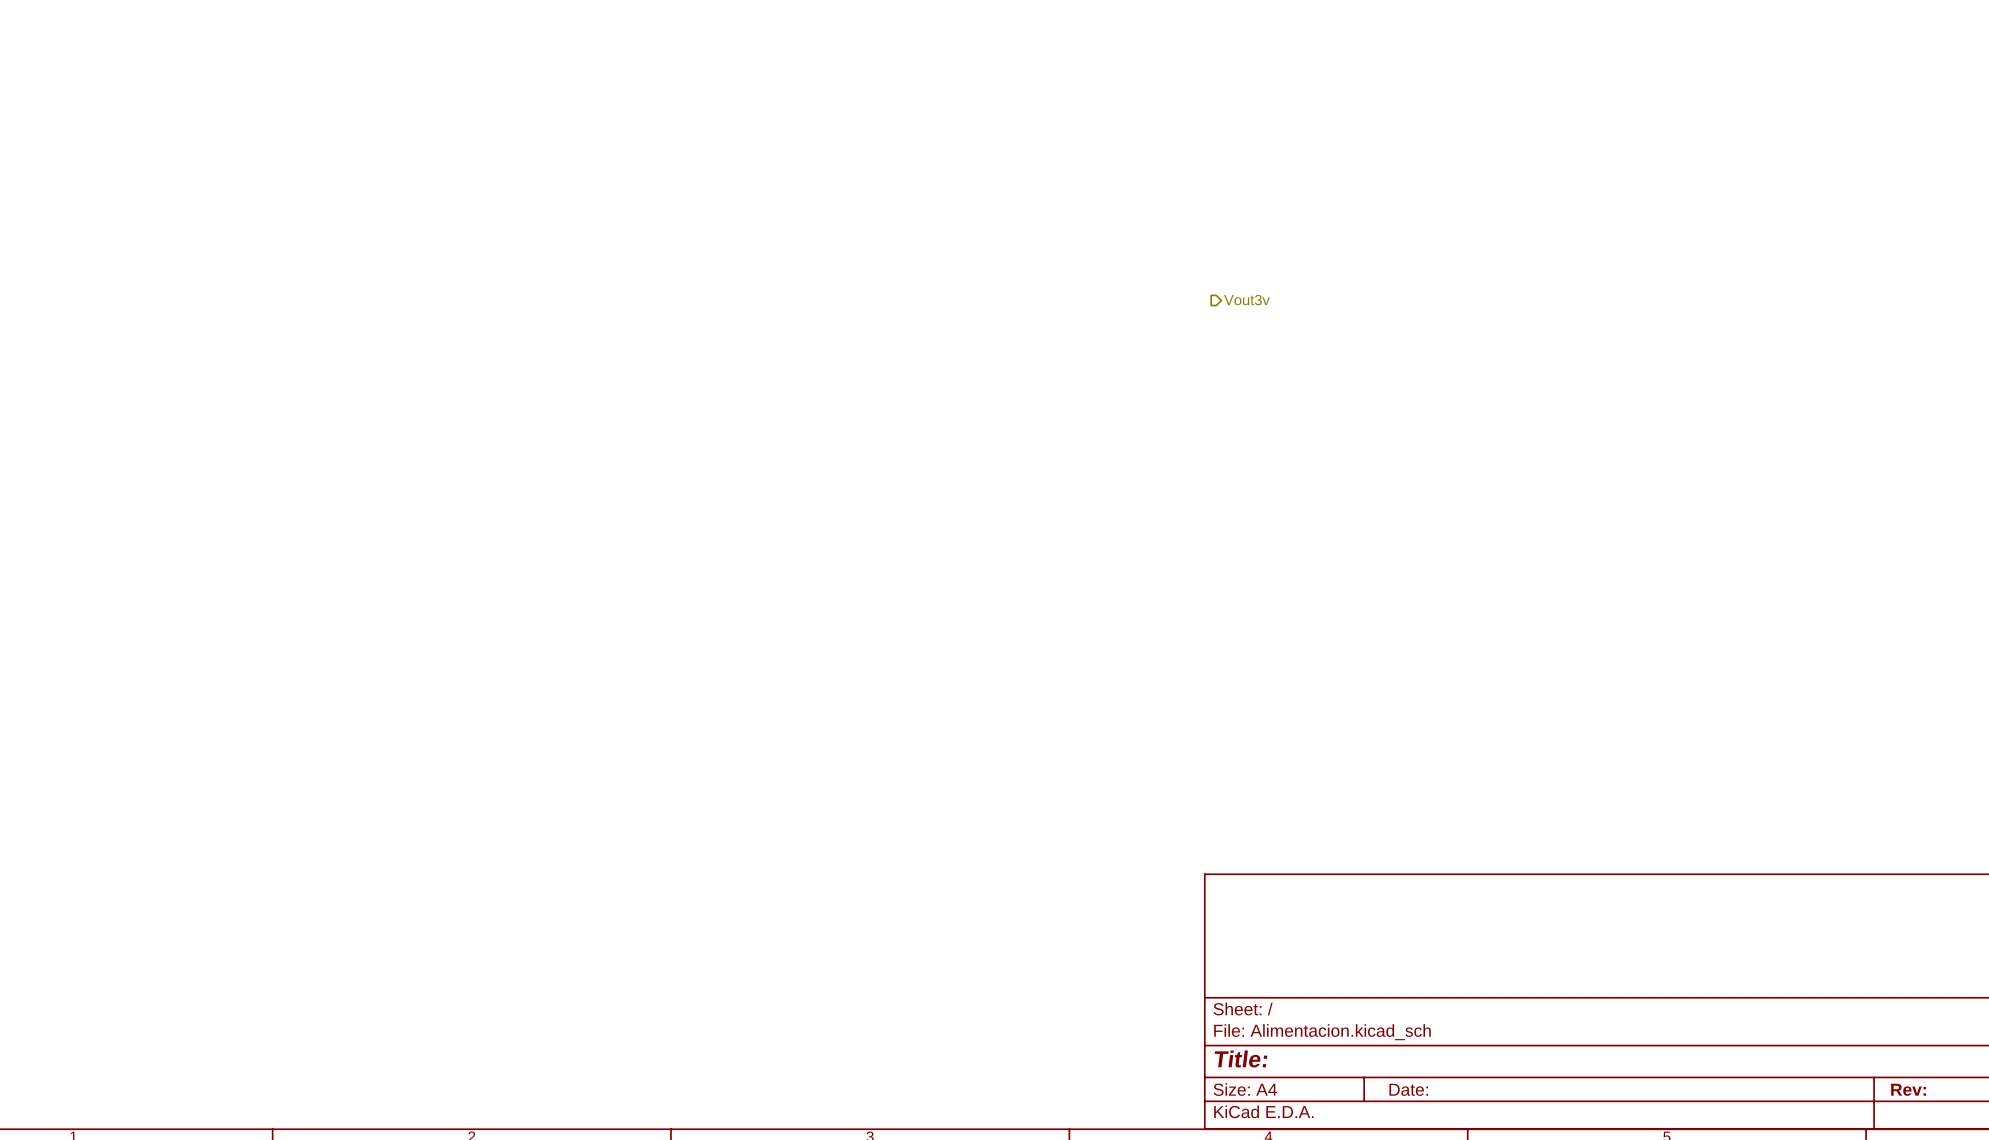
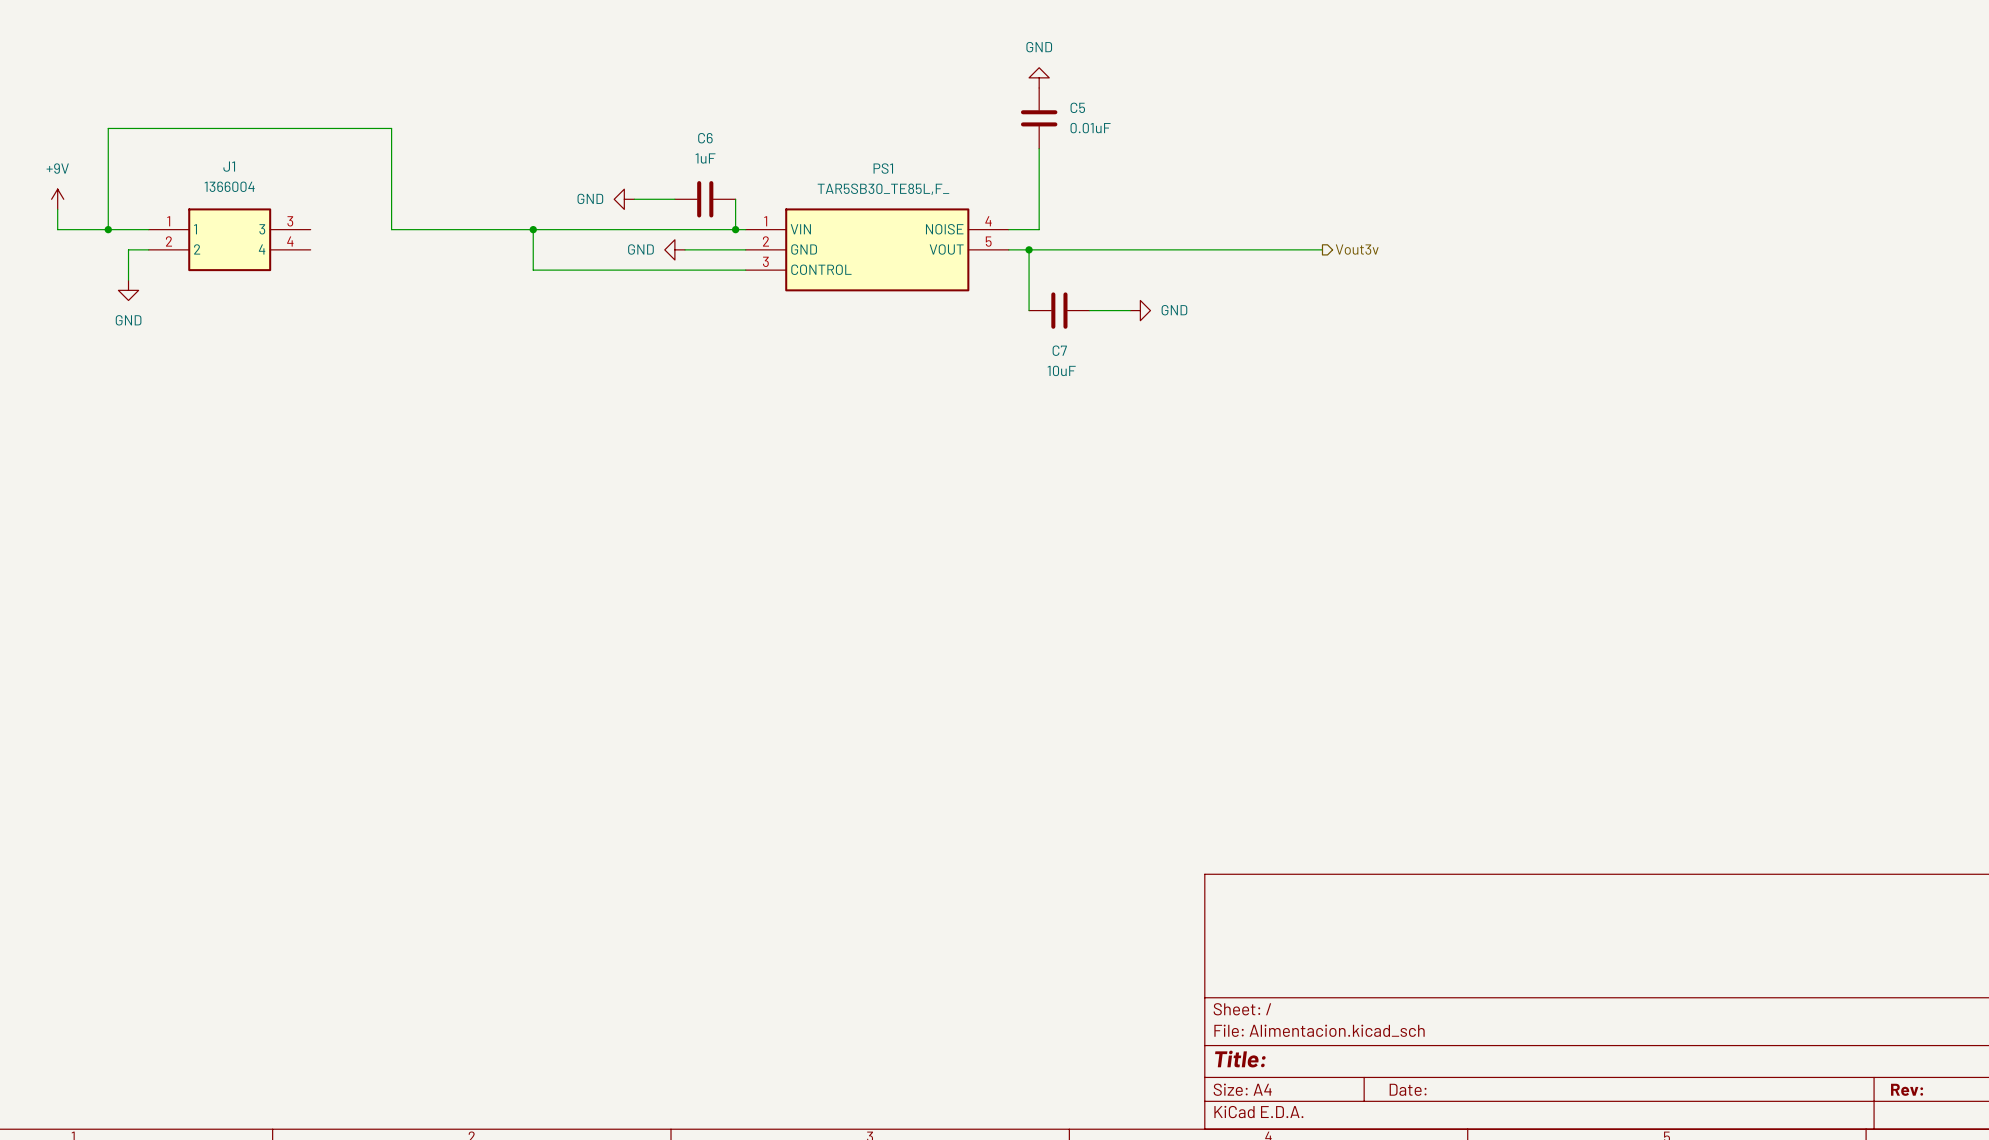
power symbol: none -> GND (1039, 77)
C5: none -> 0.01uF (1039, 118)
wire: none -> (1039, 148) (1039, 229) (1008, 229)
power symbol: none -> +9V (57, 199)
power symbol: none -> GND (624, 199)
wire: none -> (634, 199) (674, 199)
C6: none -> 1uF (705, 199)
wire: none -> (735, 199) (735, 229)
wire: none -> (57, 209) (57, 229) (148, 229)
wire: none -> (108, 229) (108, 128) (391, 128) (391, 229) (745, 229)
junction: none -> (108, 229)
wire: none -> (533, 229) (533, 270) (745, 270)
junction: none -> (533, 229)
junction: none -> (735, 229)
J1: none -> 1366004 (229, 239)
wire: none -> (148, 249) (128, 249) (128, 280)
power symbol: none -> GND (674, 249)
wire: none -> (685, 249) (745, 249)
PS1: none -> TAR5SB30_TE85L,F_ (877, 249)
wire: none -> (1008, 249) (1322, 249)
wire: none -> (1029, 249) (1029, 310)
junction: none -> (1029, 249)
power symbol: none -> GND (128, 290)
hierarchical label position: Vout3v (1246, 300) -> Vout3v (1357, 249)
C7: none -> 10uF (1059, 310)
wire: none -> (1089, 310) (1130, 310)
power symbol: none -> GND (1140, 310)

